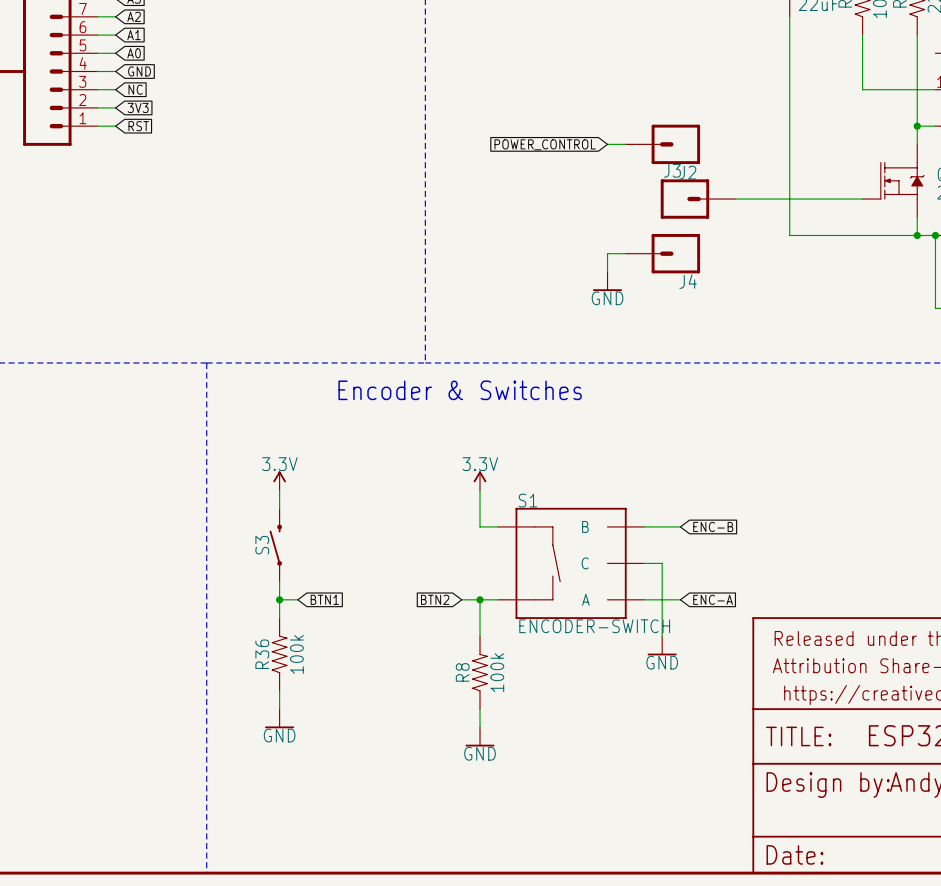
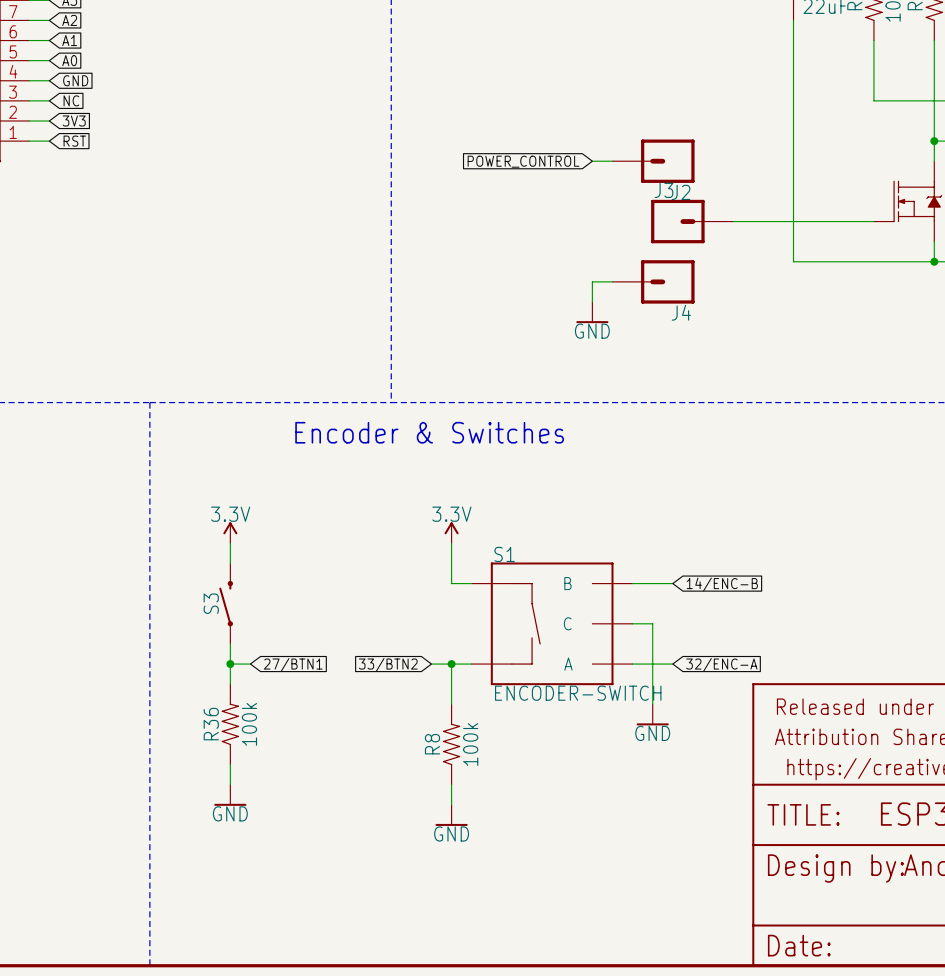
global label: ENC-B (713, 526) -> 14/ENC-B (722, 584)
global label: BTN1 (324, 599) -> 27/BTN1 (293, 665)
global label: BTN2 (435, 599) -> 33/BTN2 (388, 665)
global label: ENC-A (713, 599) -> 32/ENC-A (721, 665)

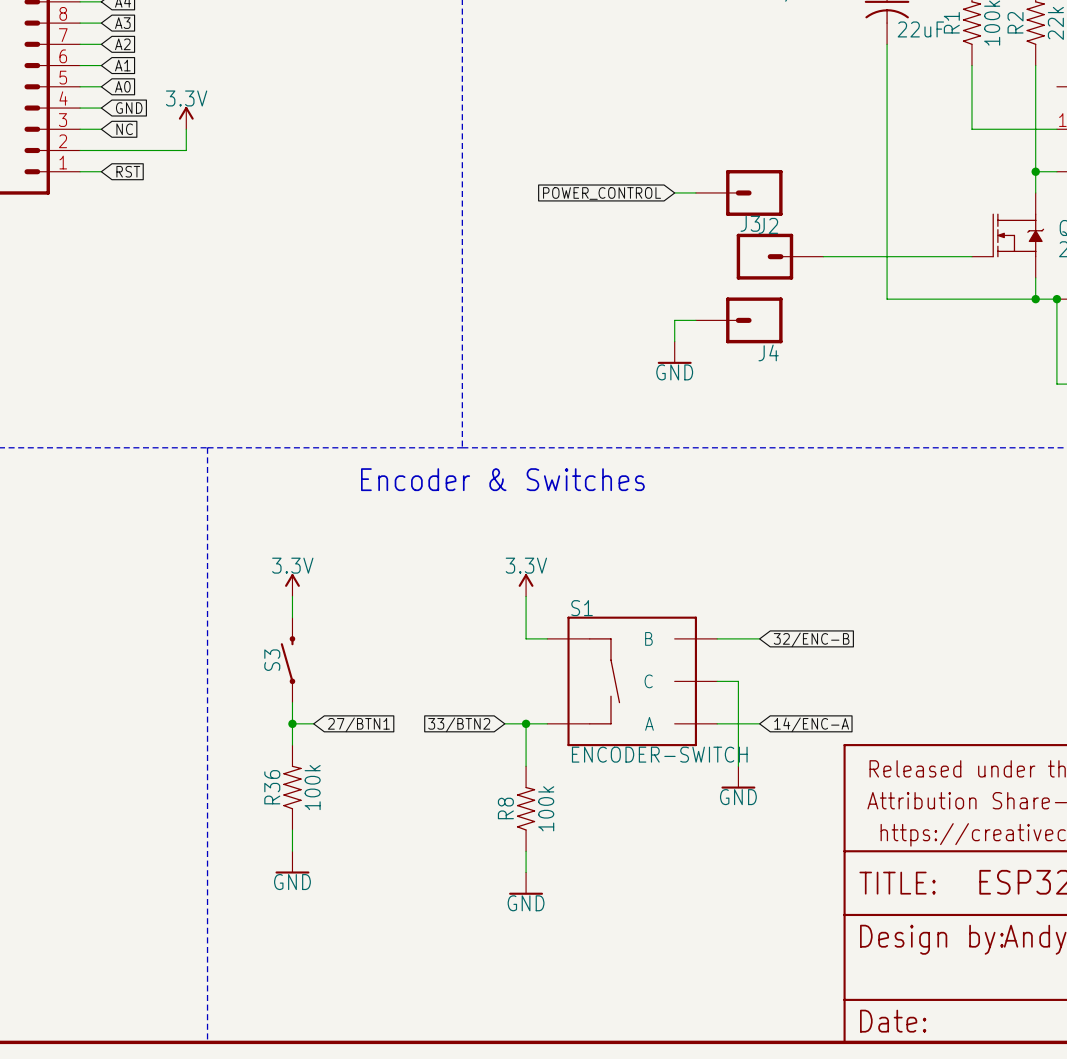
power symbol: none -> 3.3V (186, 118)
wire: none -> (186, 129) (186, 150) (101, 150)
global label: 3V3 (74, 120) -> none
global label: 14/ENC-B (722, 584) -> 32/ENC-B (811, 639)
global label: 32/ENC-A (721, 665) -> 14/ENC-A (811, 724)

